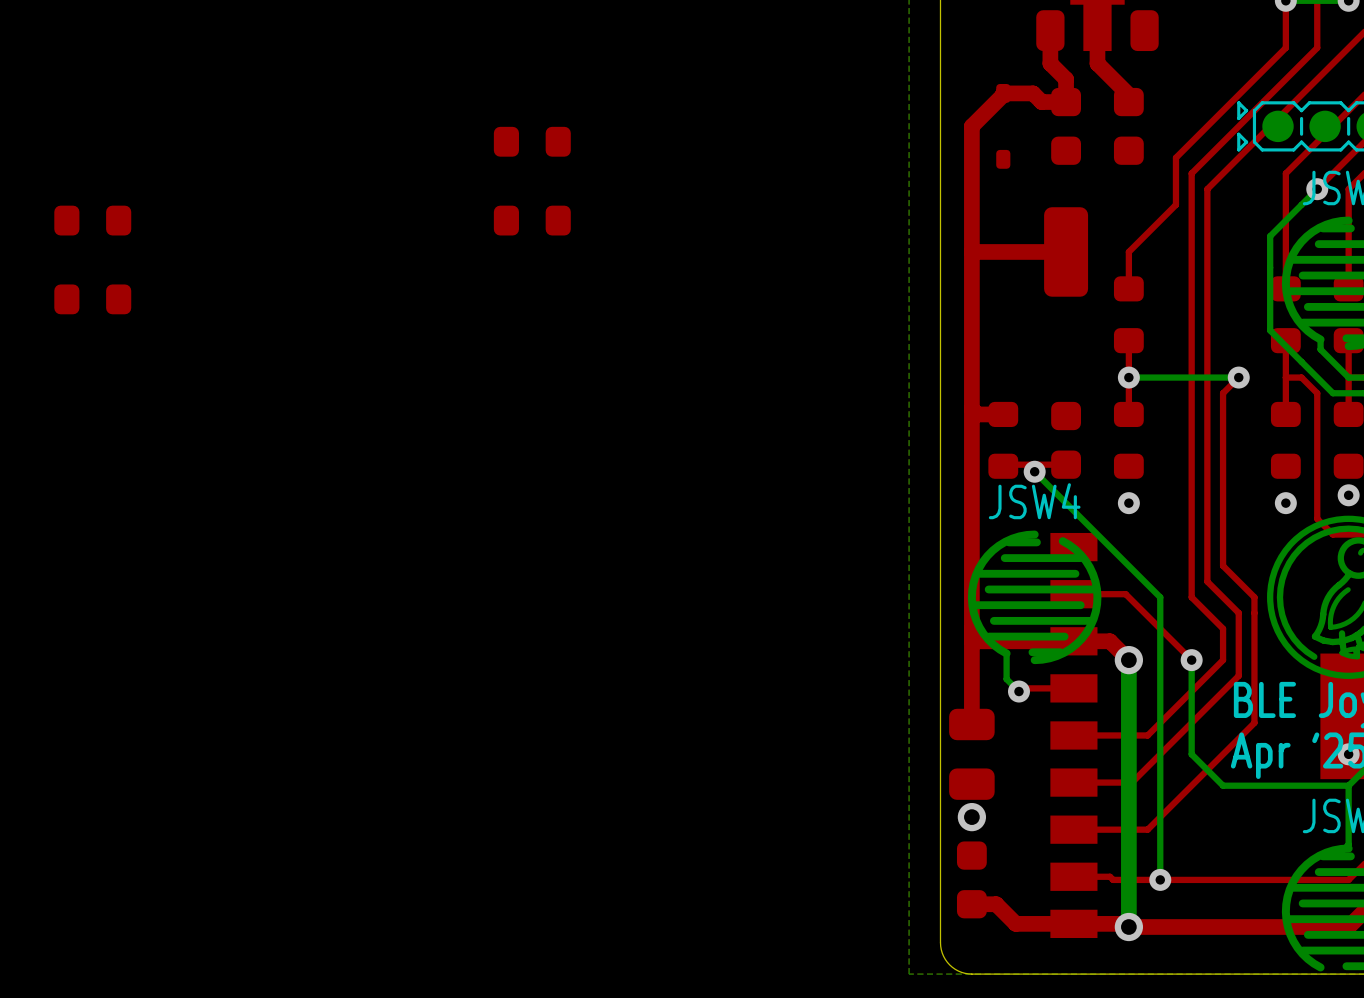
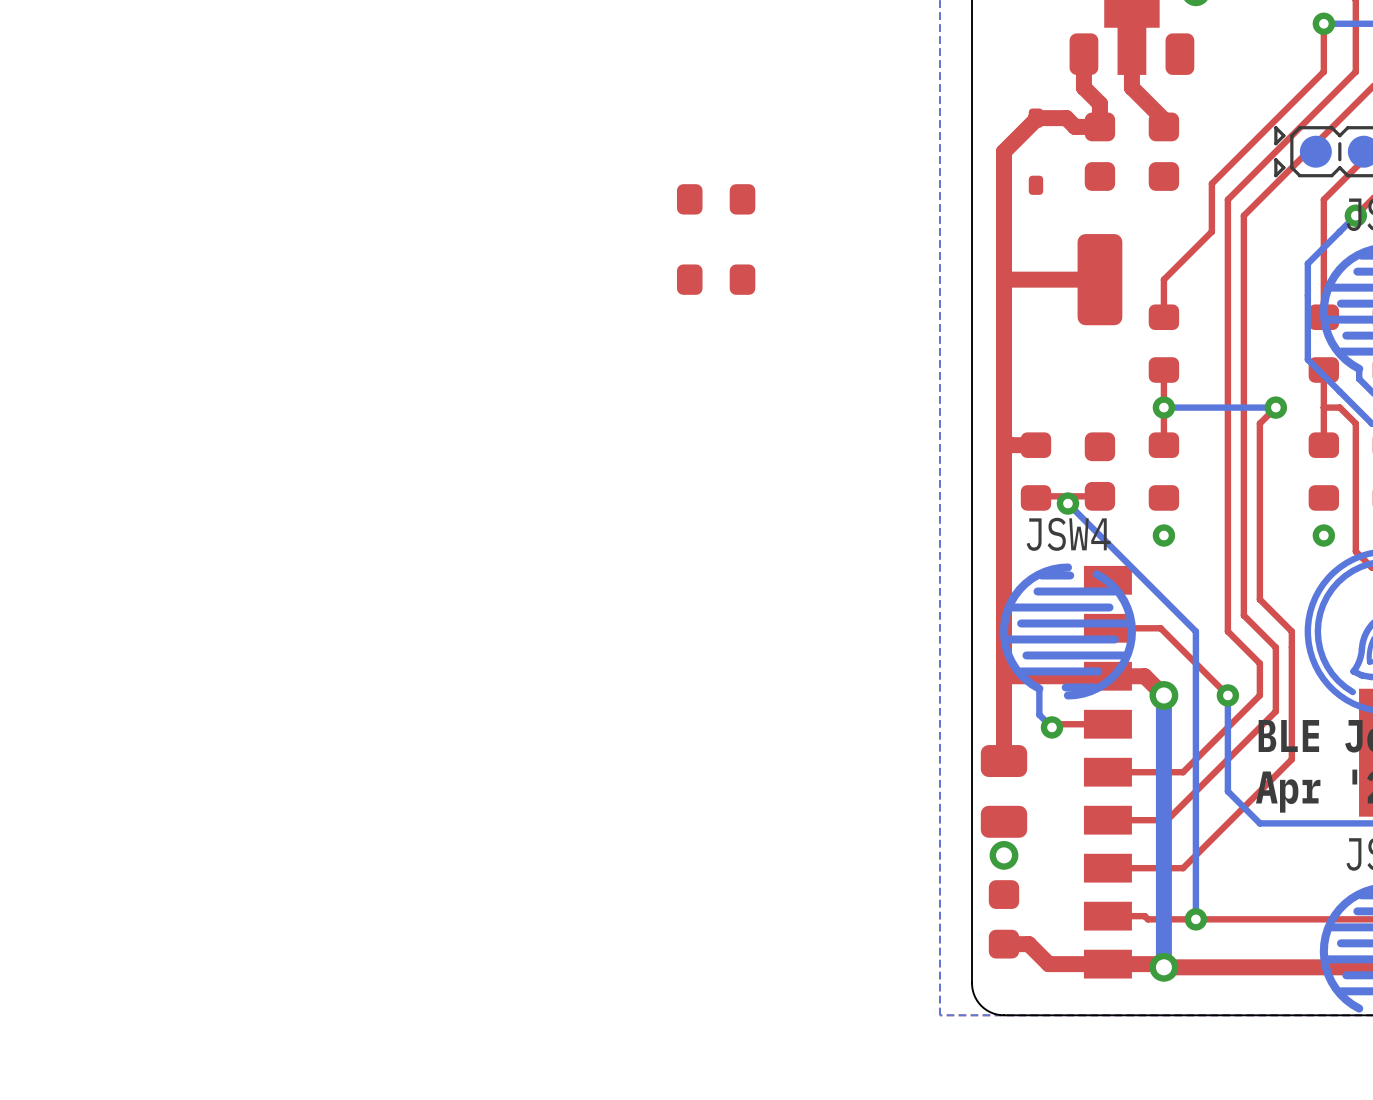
part: (532, 141) -> none
part: none -> (716, 199)
part: (92, 220) -> none
part: (532, 220) -> none
part: none -> (716, 279)
part: (92, 299) -> none

